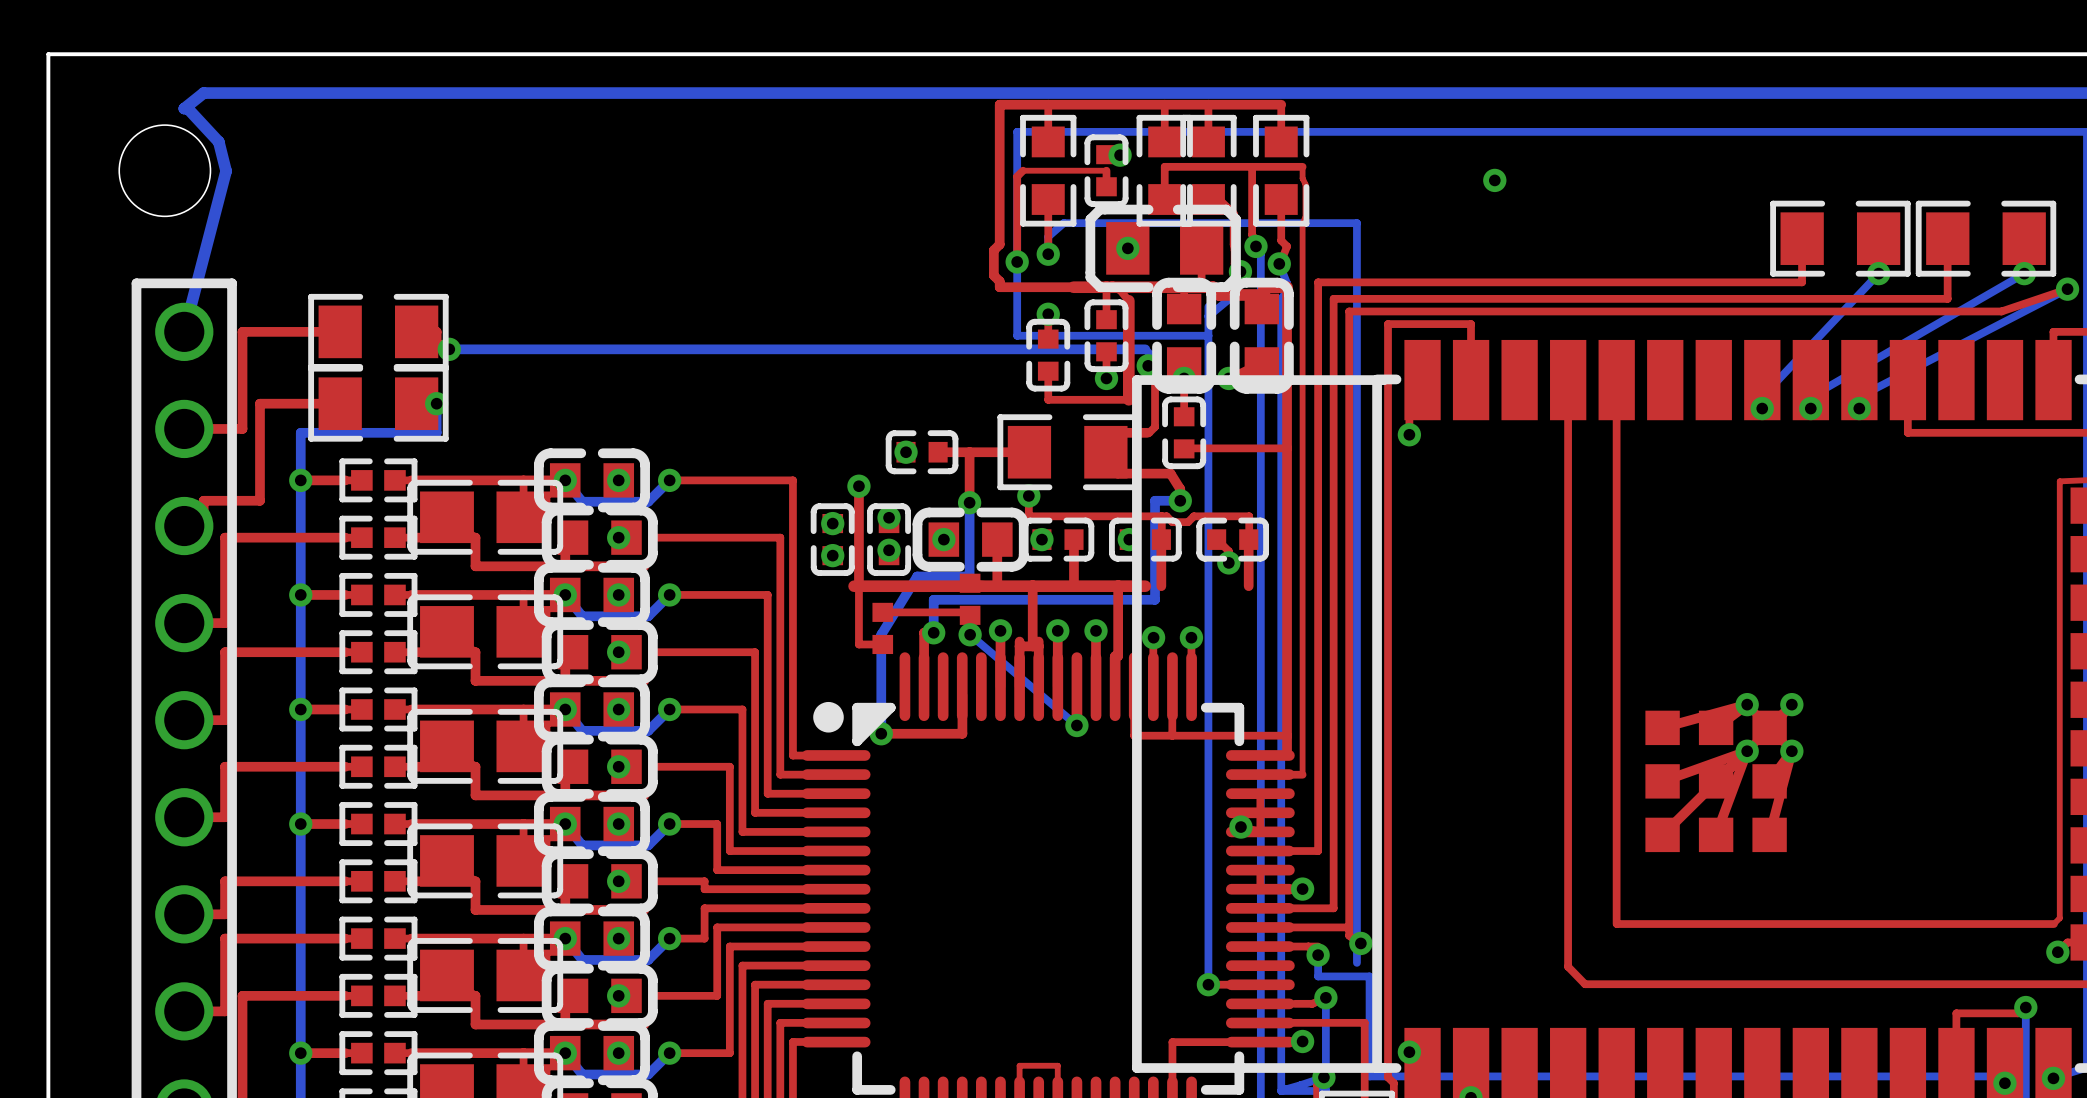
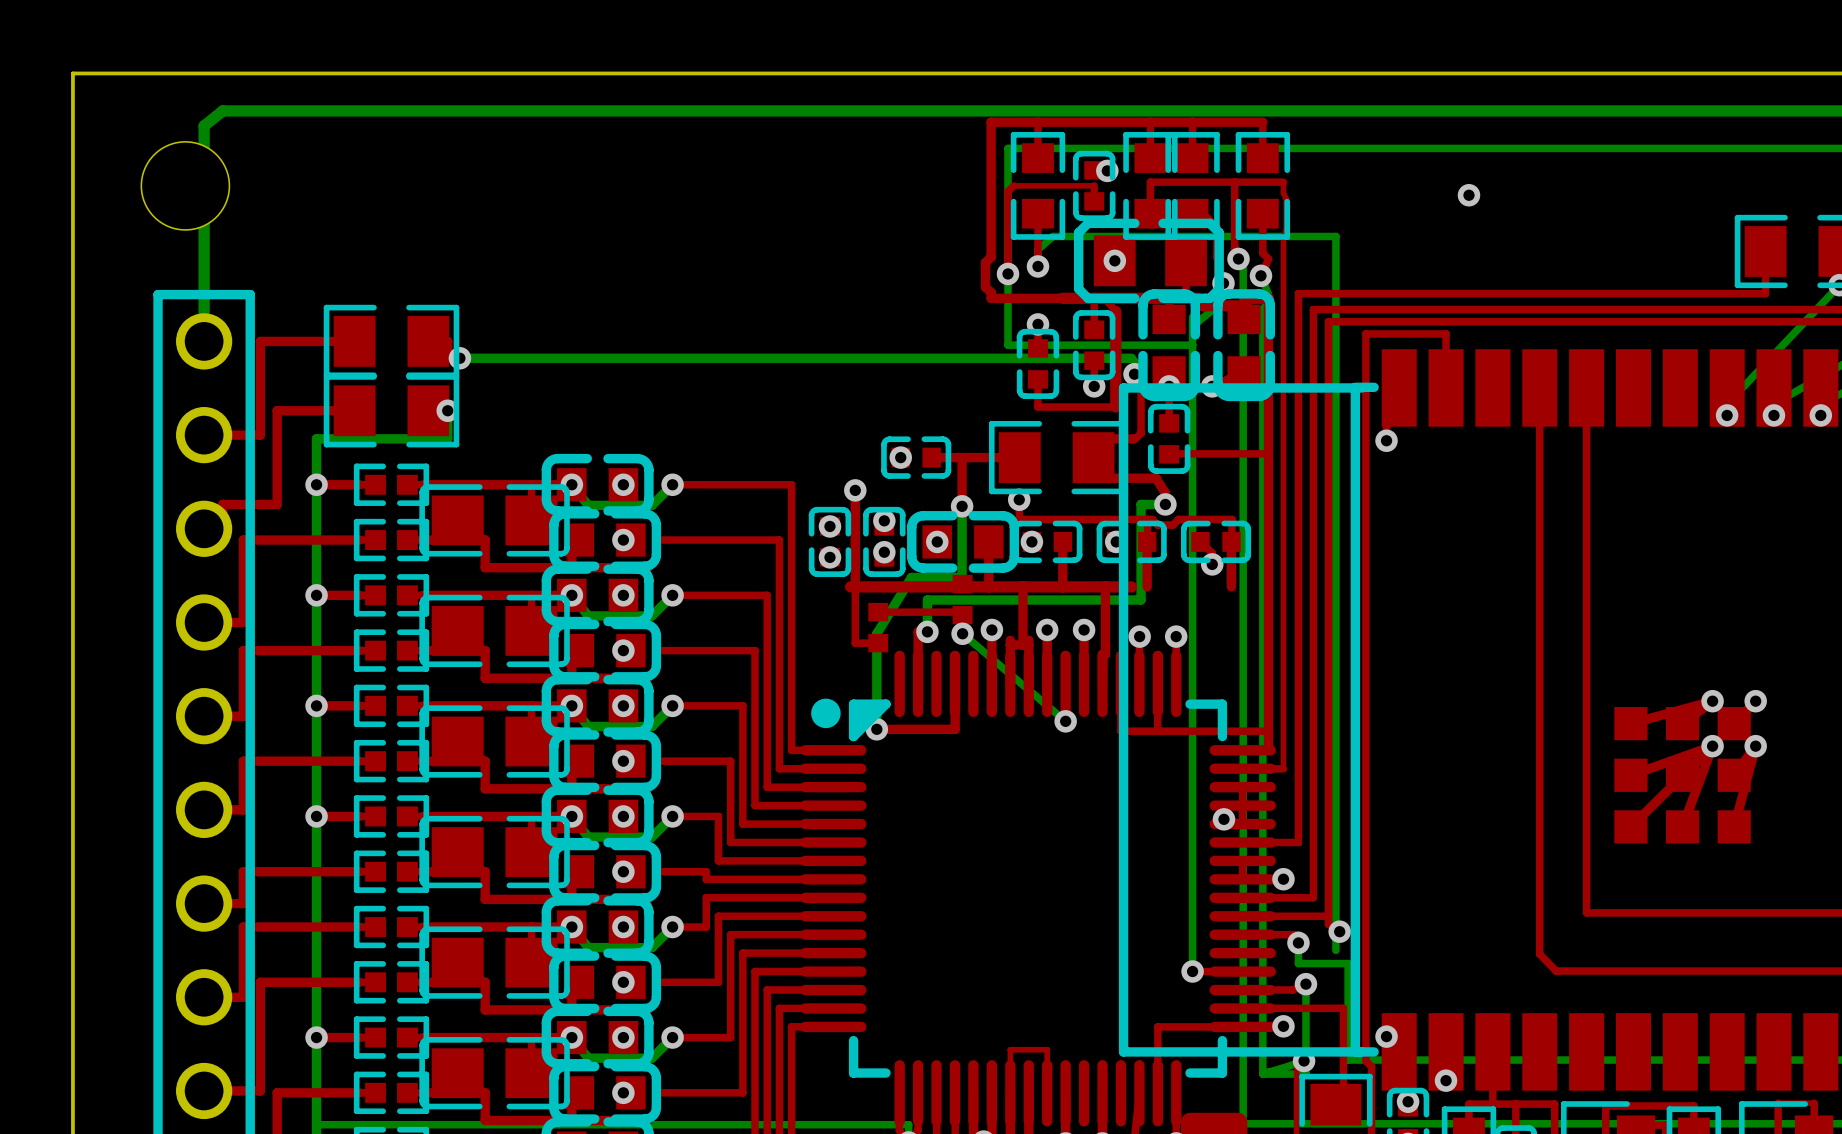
bottom track: (184, 108) (187, 108) (218, 141) (226, 171) (184, 331) -> (204, 125) (204, 341)

